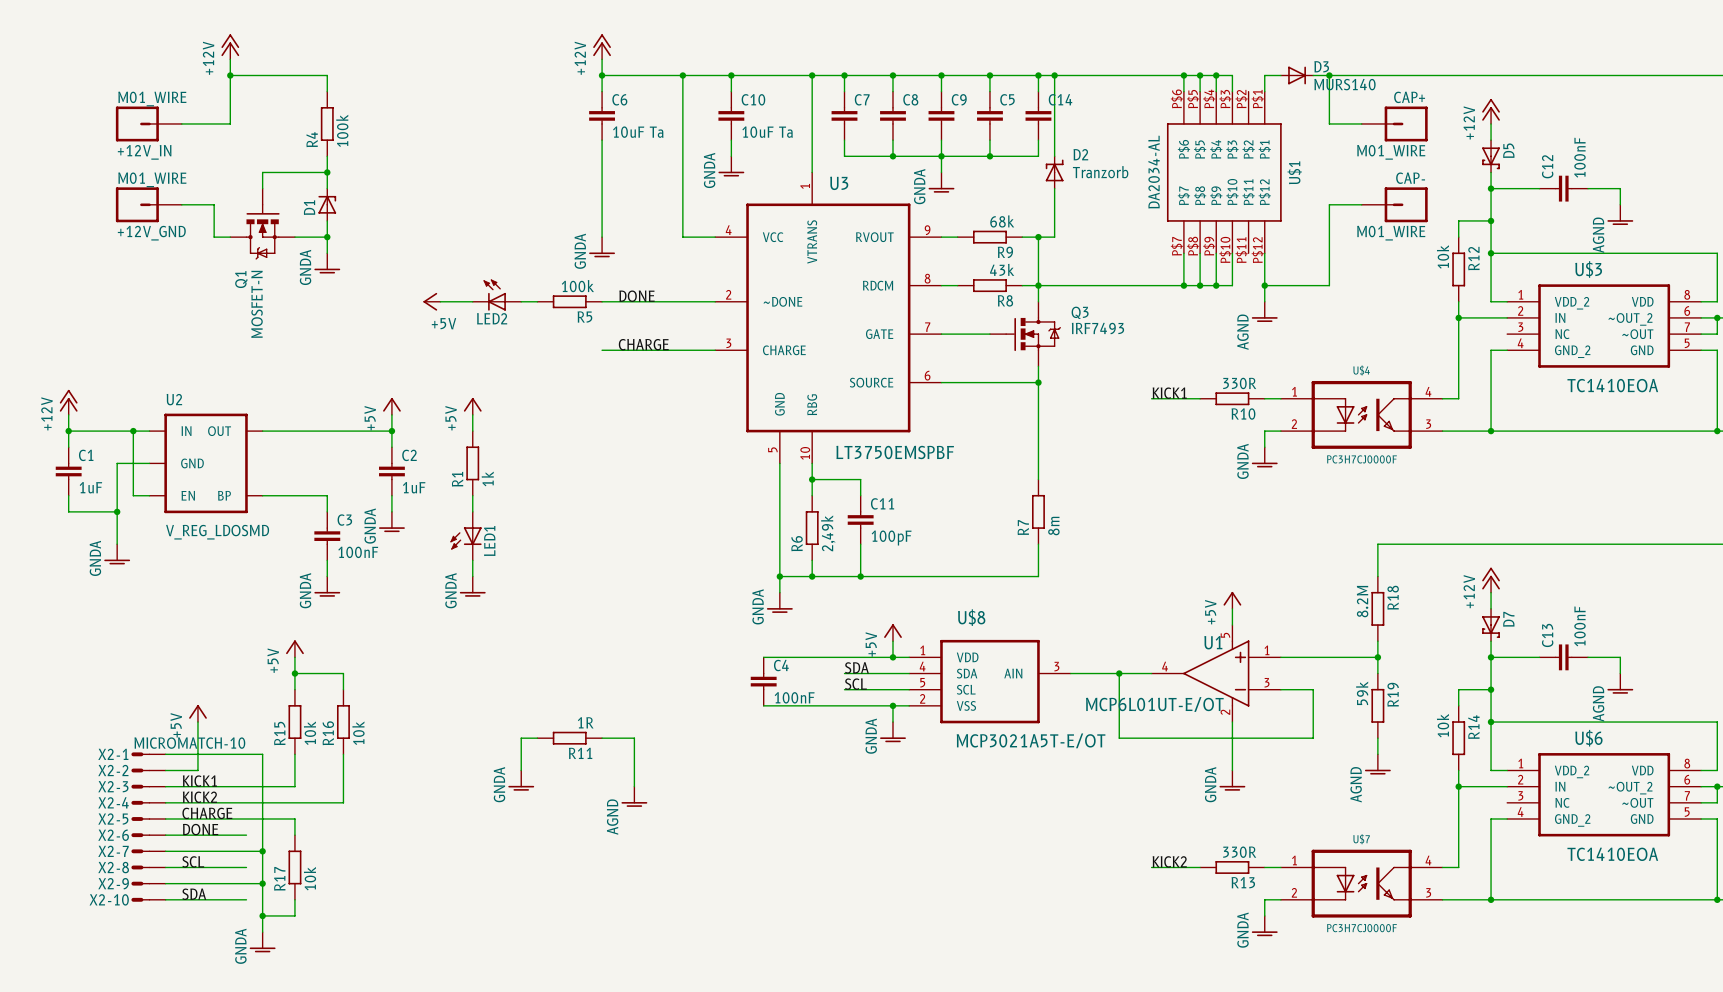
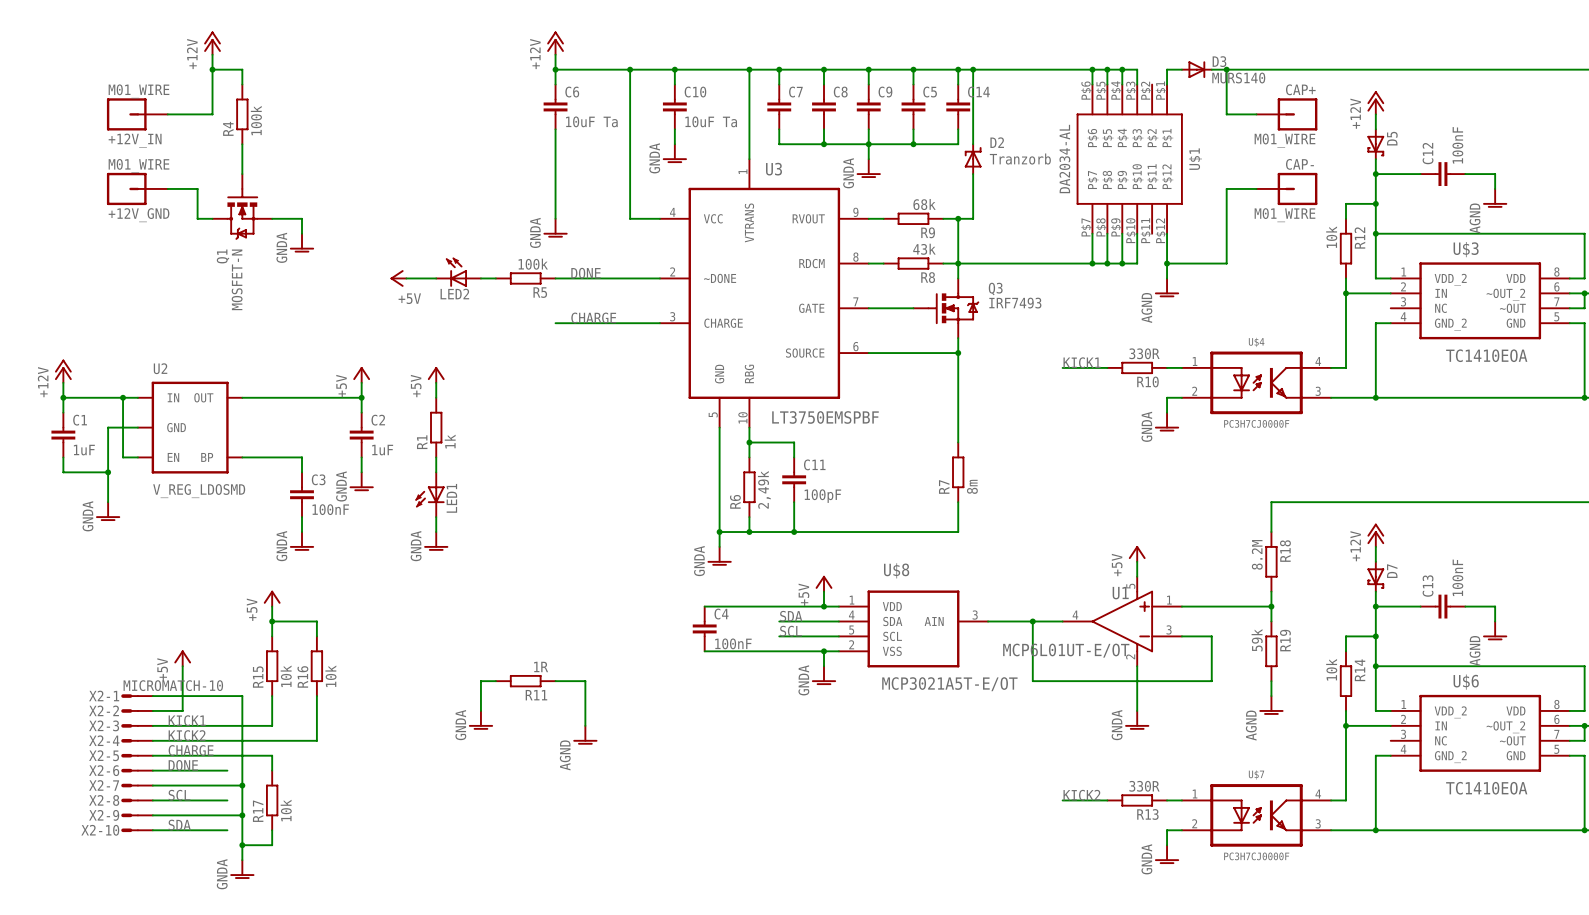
wire: (262, 75) (327, 75) (327, 91) -> (242, 69) (242, 84)
R4 position: (327, 123) -> (242, 114)
wire: (327, 156) (327, 188) -> none
wire: (262, 172) (327, 172) -> (242, 159) (242, 144)
junction: (327, 172) -> none
D1: (327, 204) -> none
wire: (327, 220) (327, 237) -> none
junction: (327, 237) -> none

